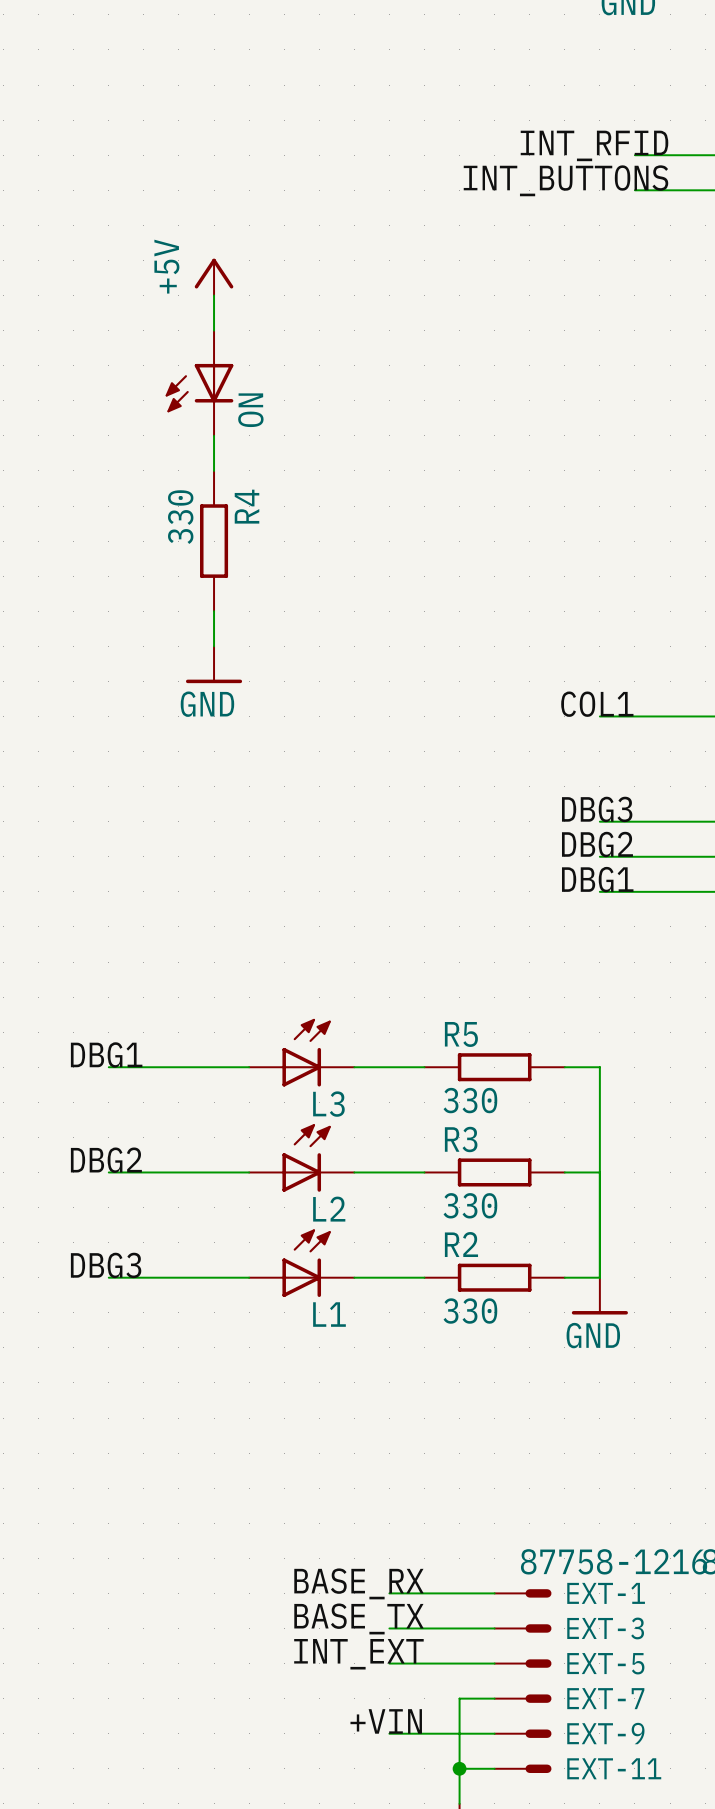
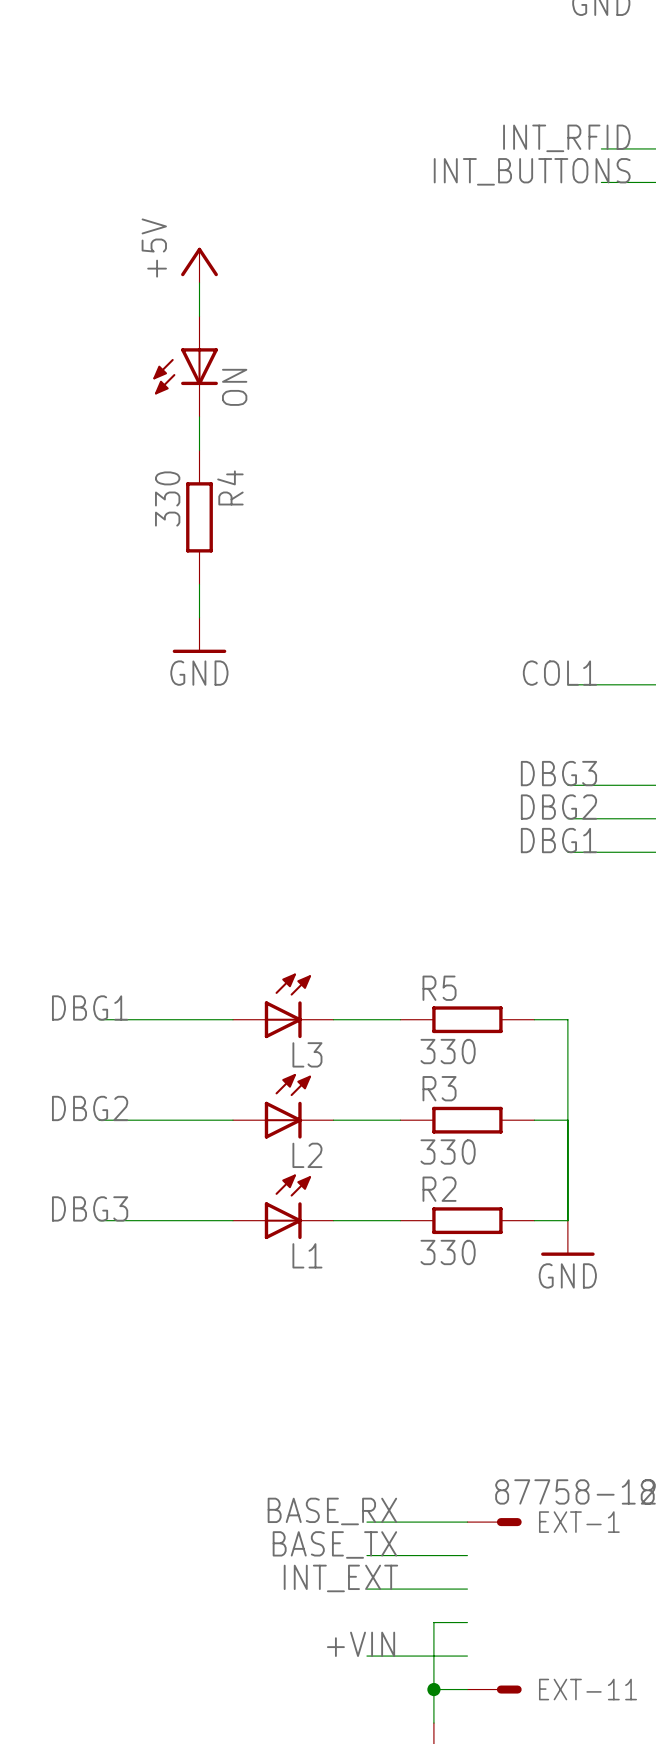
EXT-3: (523, 1628) -> none
EXT-5: (523, 1663) -> none
EXT-7: (523, 1698) -> none
EXT-9: (523, 1733) -> none

